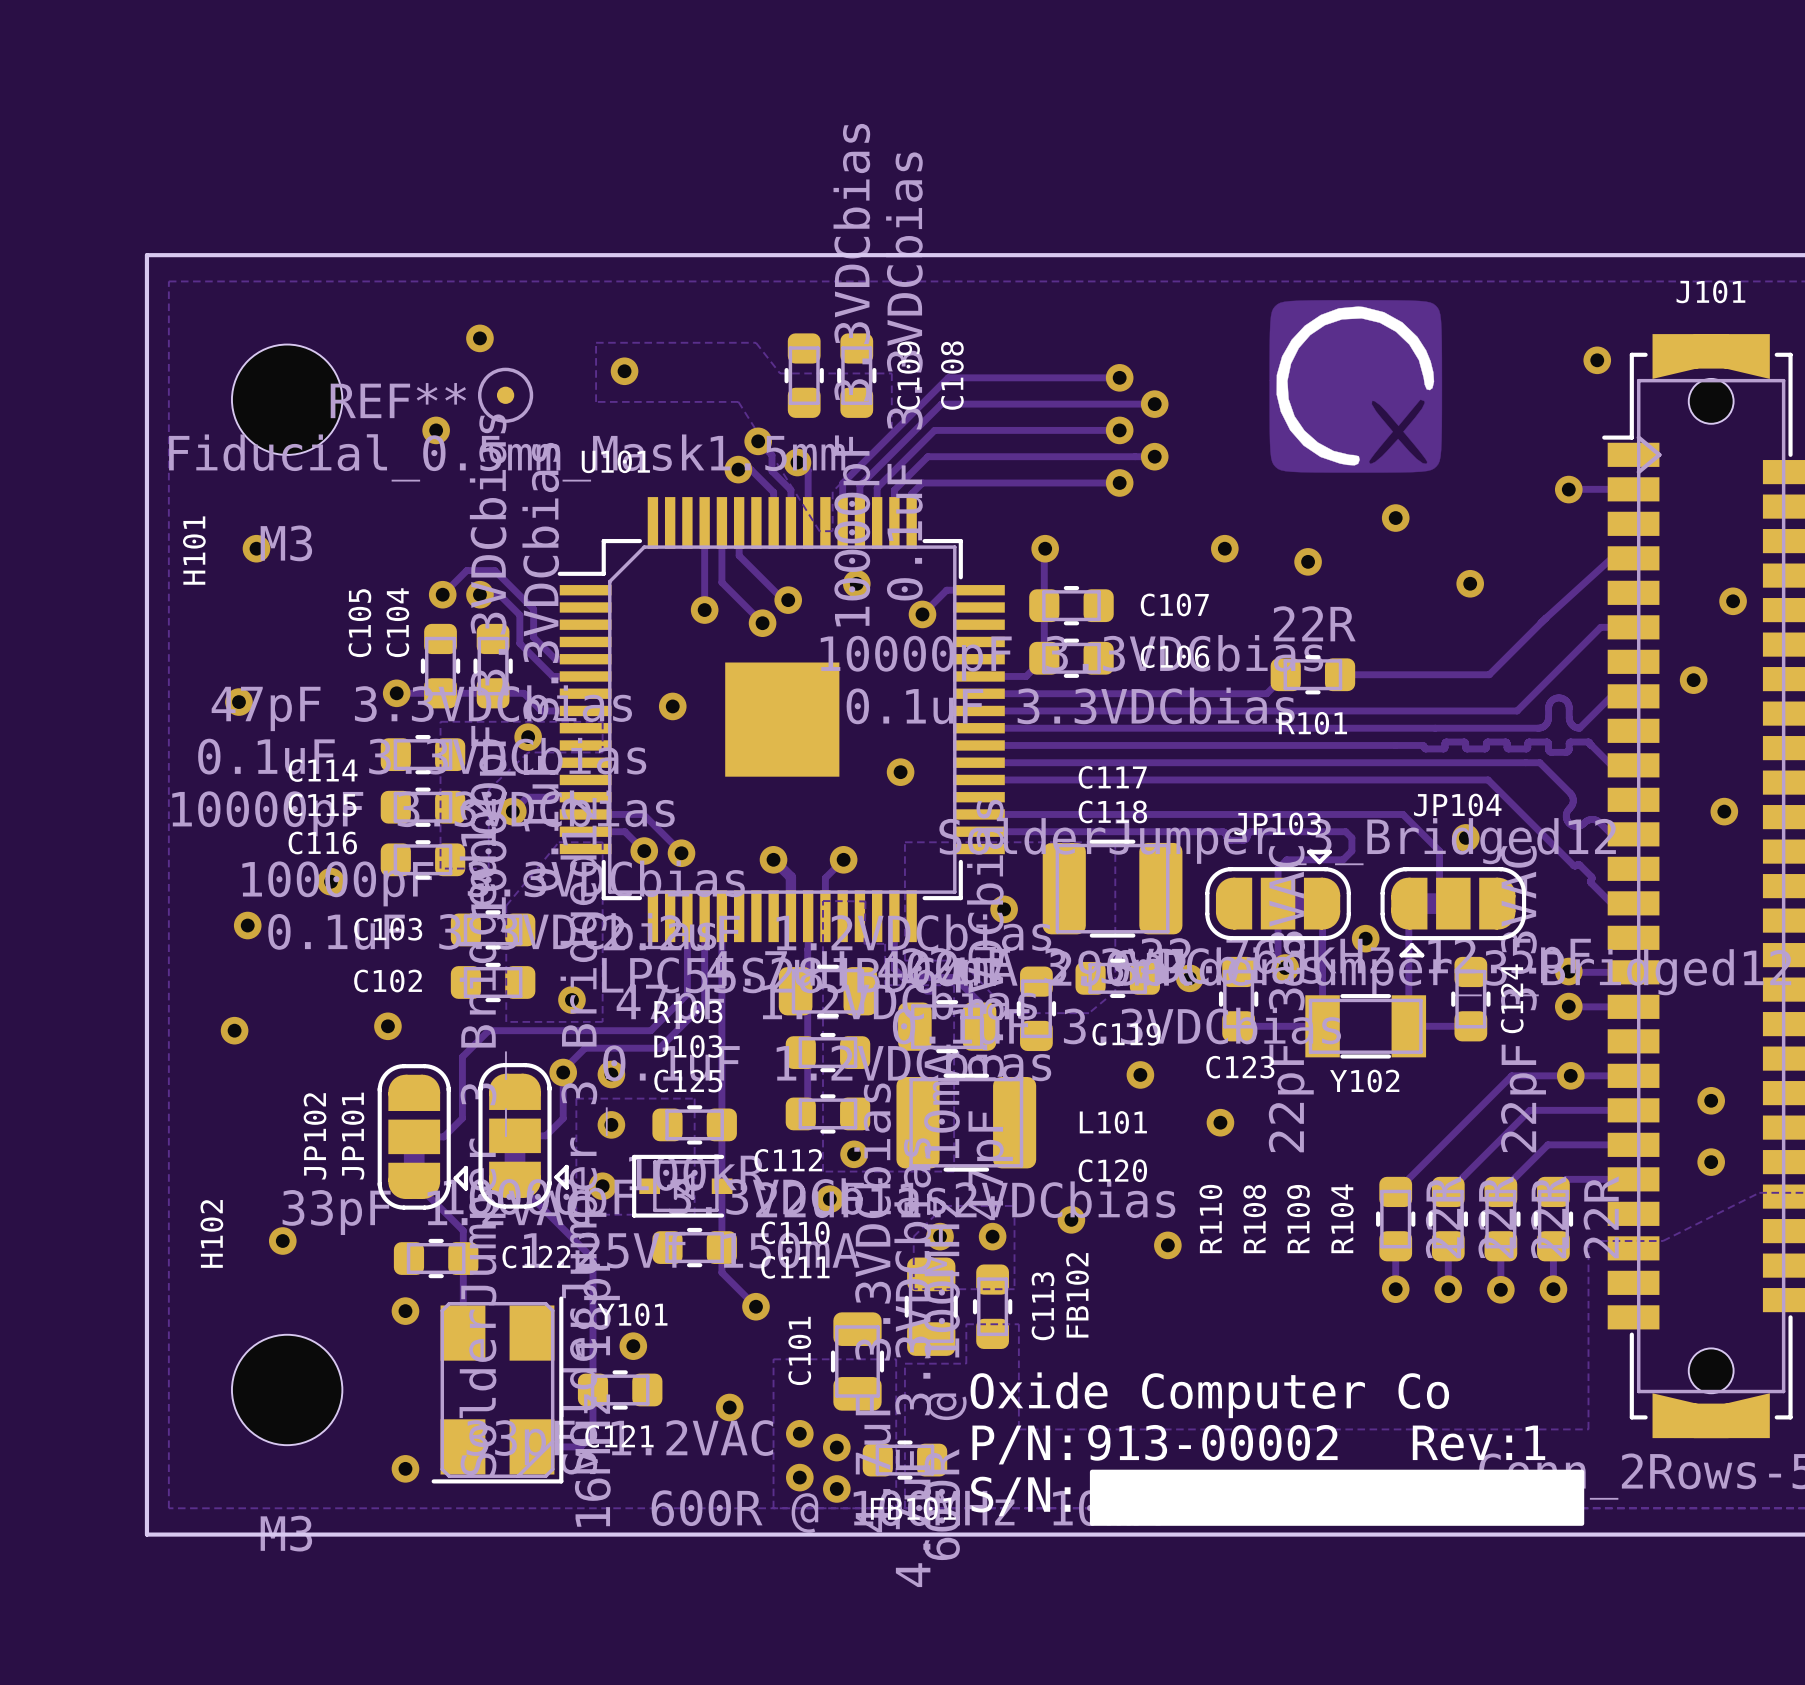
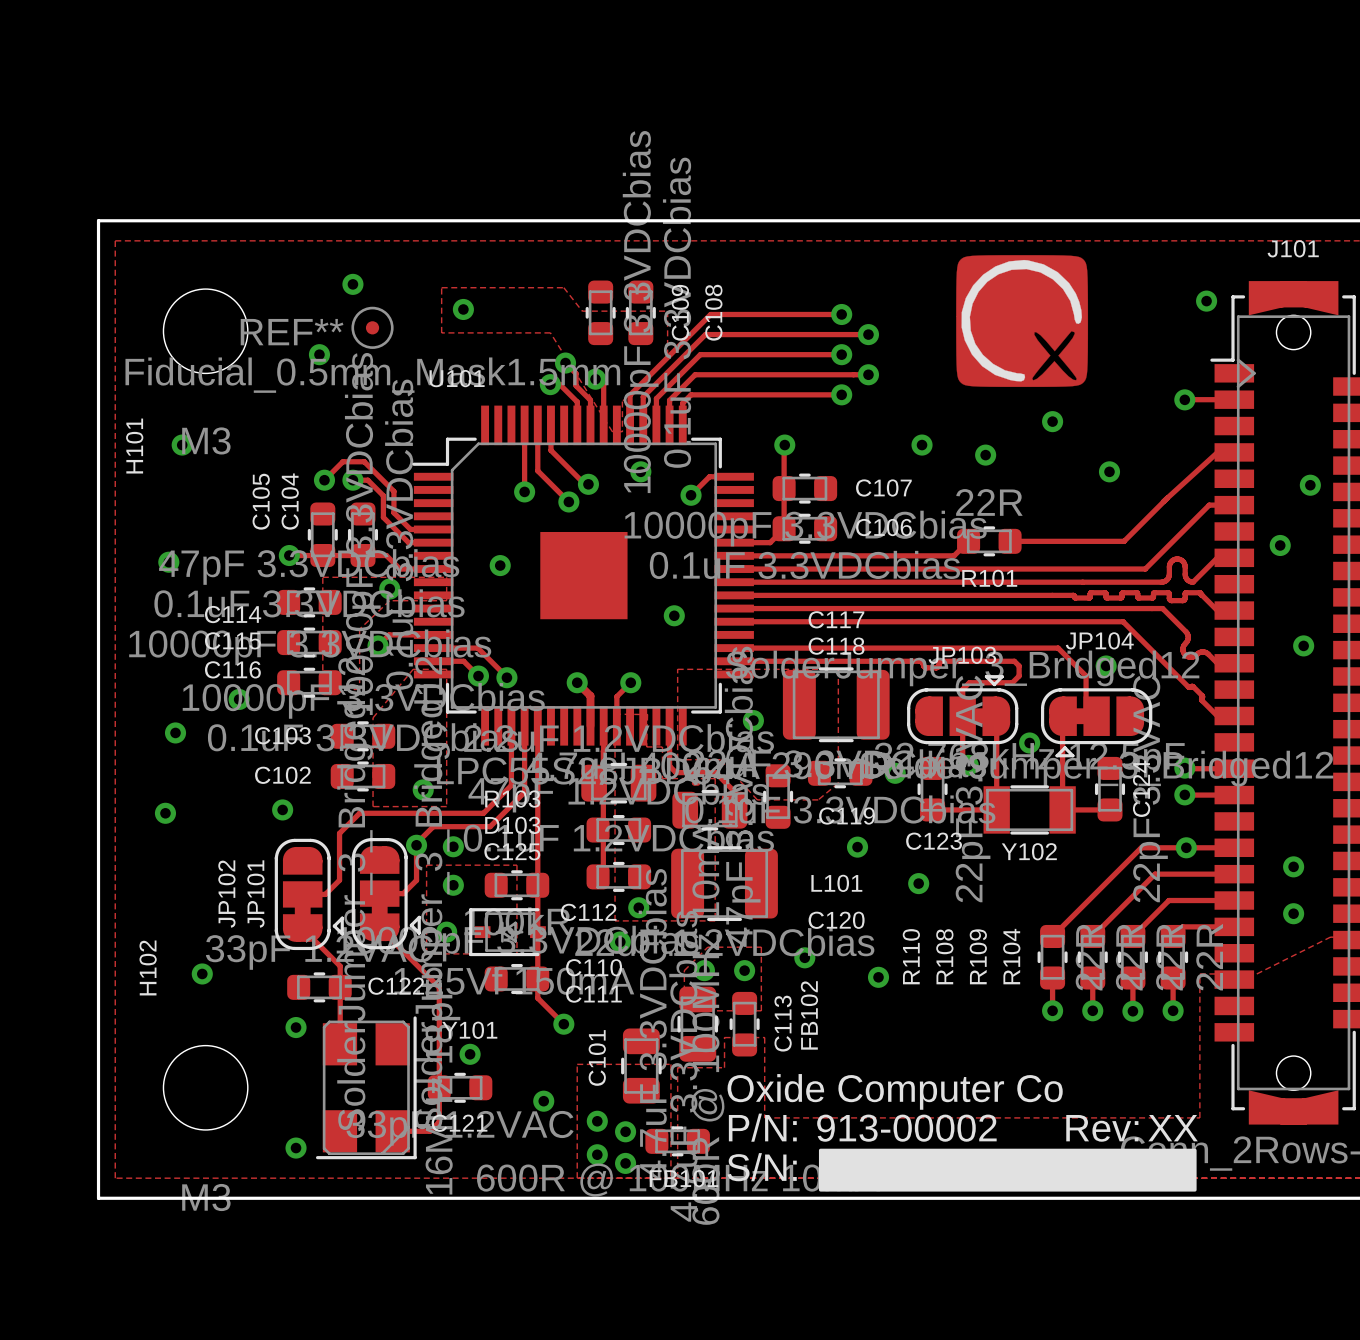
drawing shape: [970, 1372, 1585, 1526] -> [727, 1074, 1198, 1192]

